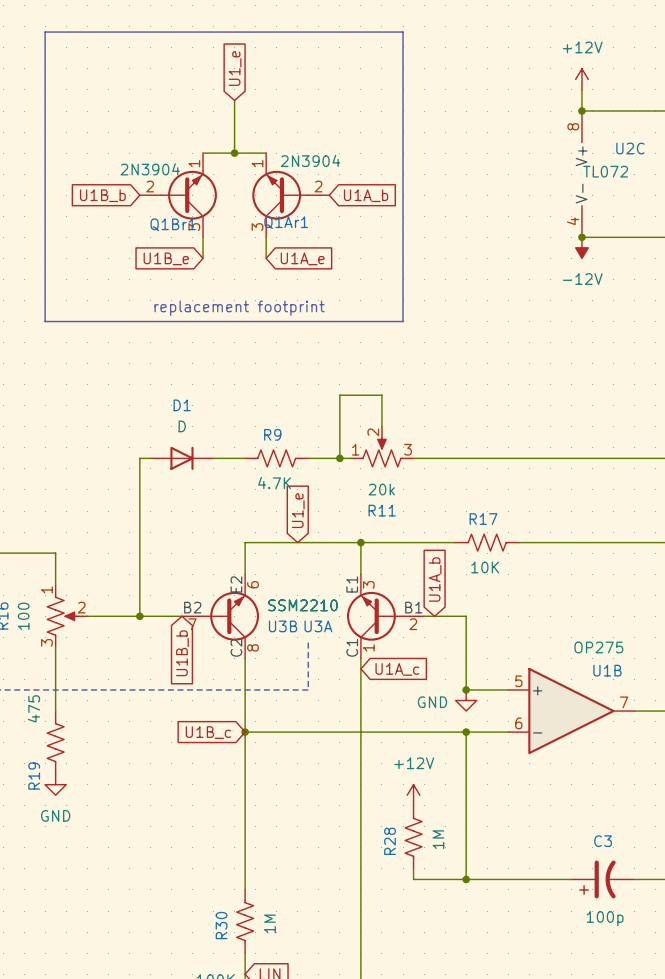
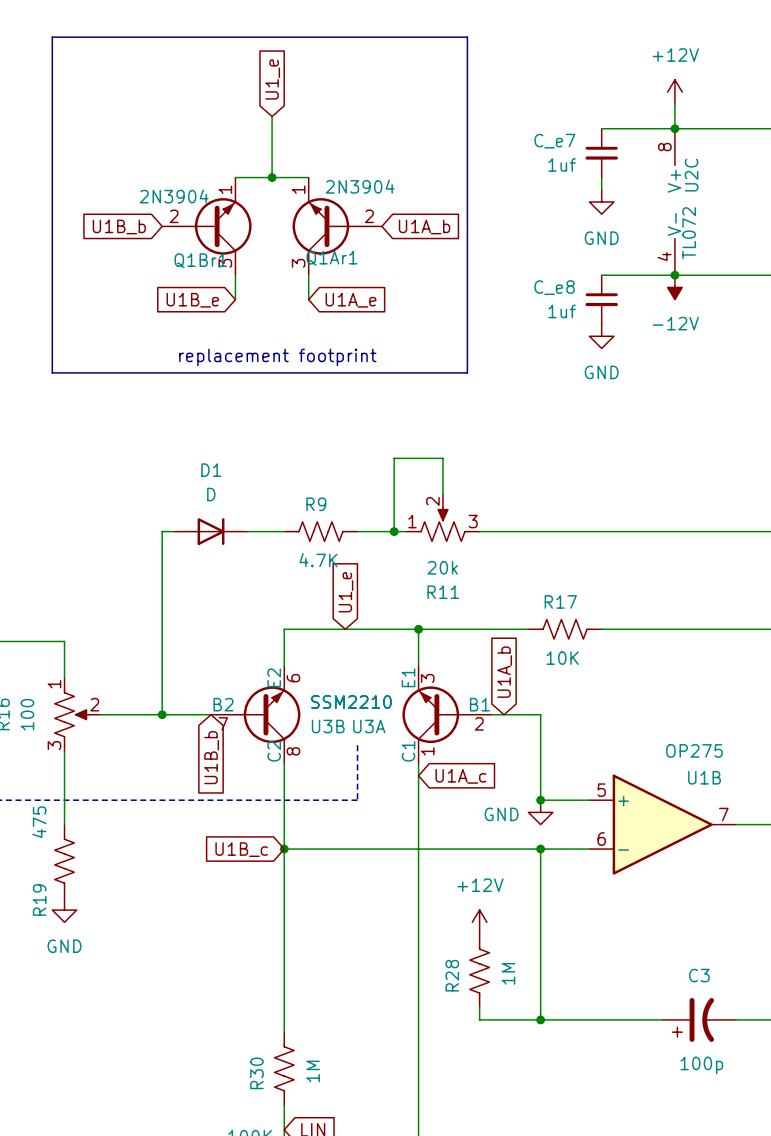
wire: none -> (601, 128) (674, 128)
C_e7: none -> 1uf (601, 153)
U2C name rotation: 0° (630, 148) -> 90° counterclockwise (691, 175)
wire: none -> (601, 177) (601, 189)
U2C value rotation: 0° (605, 171) -> 90° counterclockwise (689, 233)
power symbol: none -> GND (601, 201)
wire: none -> (601, 275) (674, 275)
C_e8: none -> 1uf (601, 299)
power symbol: none -> GND (601, 336)

